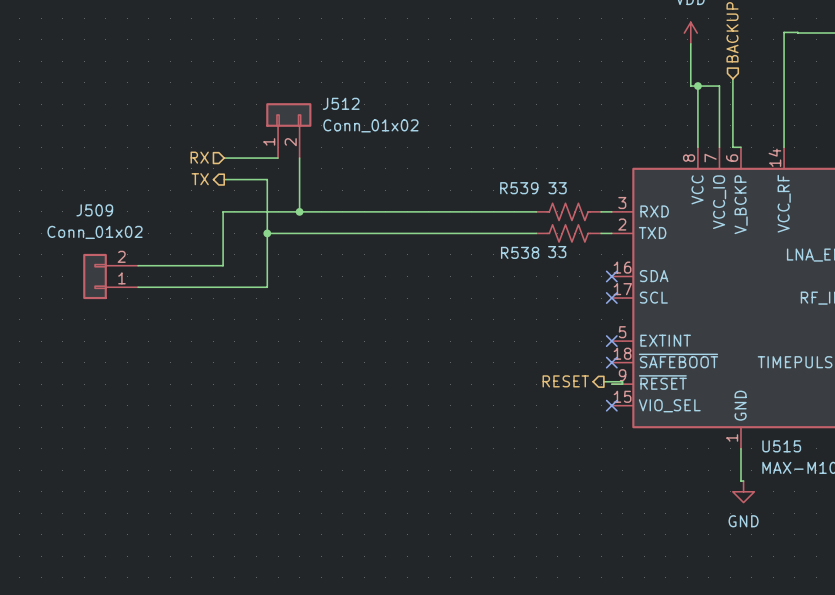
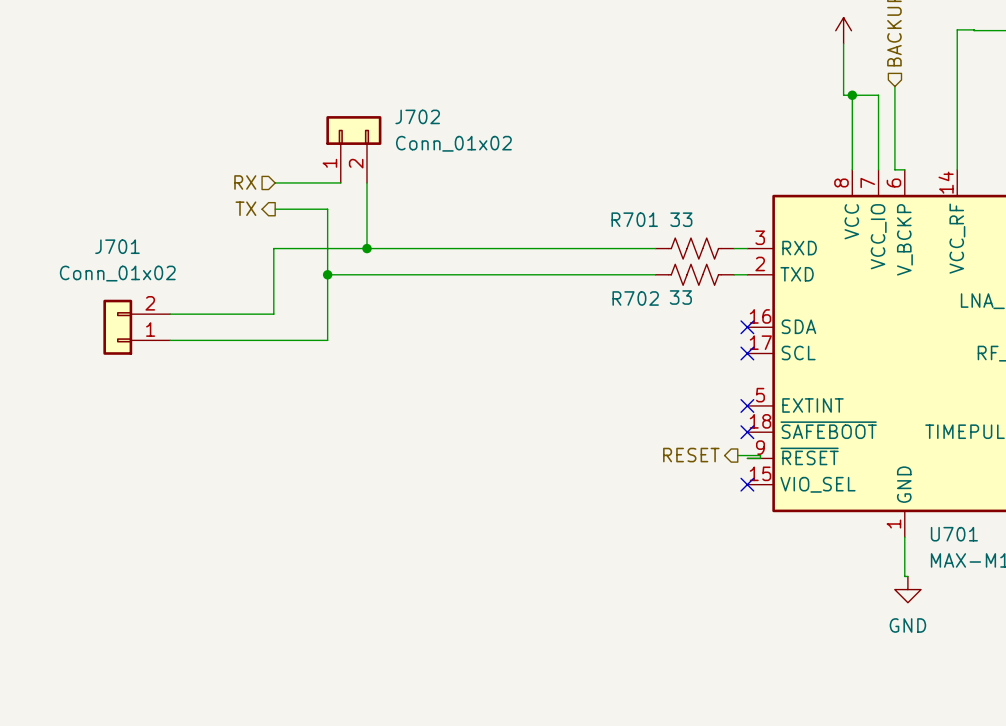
J512 name: J512 (341, 103) -> J702 (417, 116)
R539 name: R539 (519, 188) -> R701 (634, 219)
J509 name: J509 (94, 210) -> J701 (117, 246)
R538 name: R538 (520, 252) -> R702 (635, 298)
U515 name: U515 (781, 446) -> U701 (954, 534)

